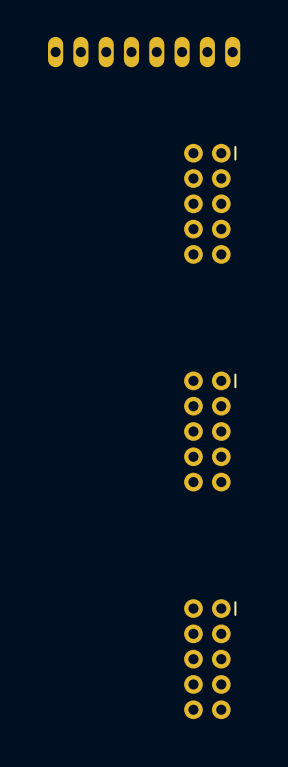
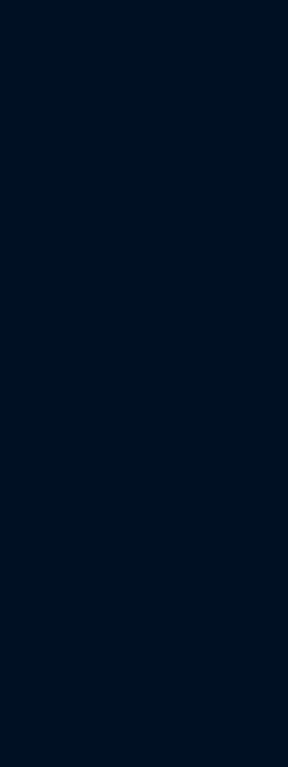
part: (144, 52) -> none
part: (210, 203) -> none
part: (210, 431) -> none
part: (210, 659) -> none

